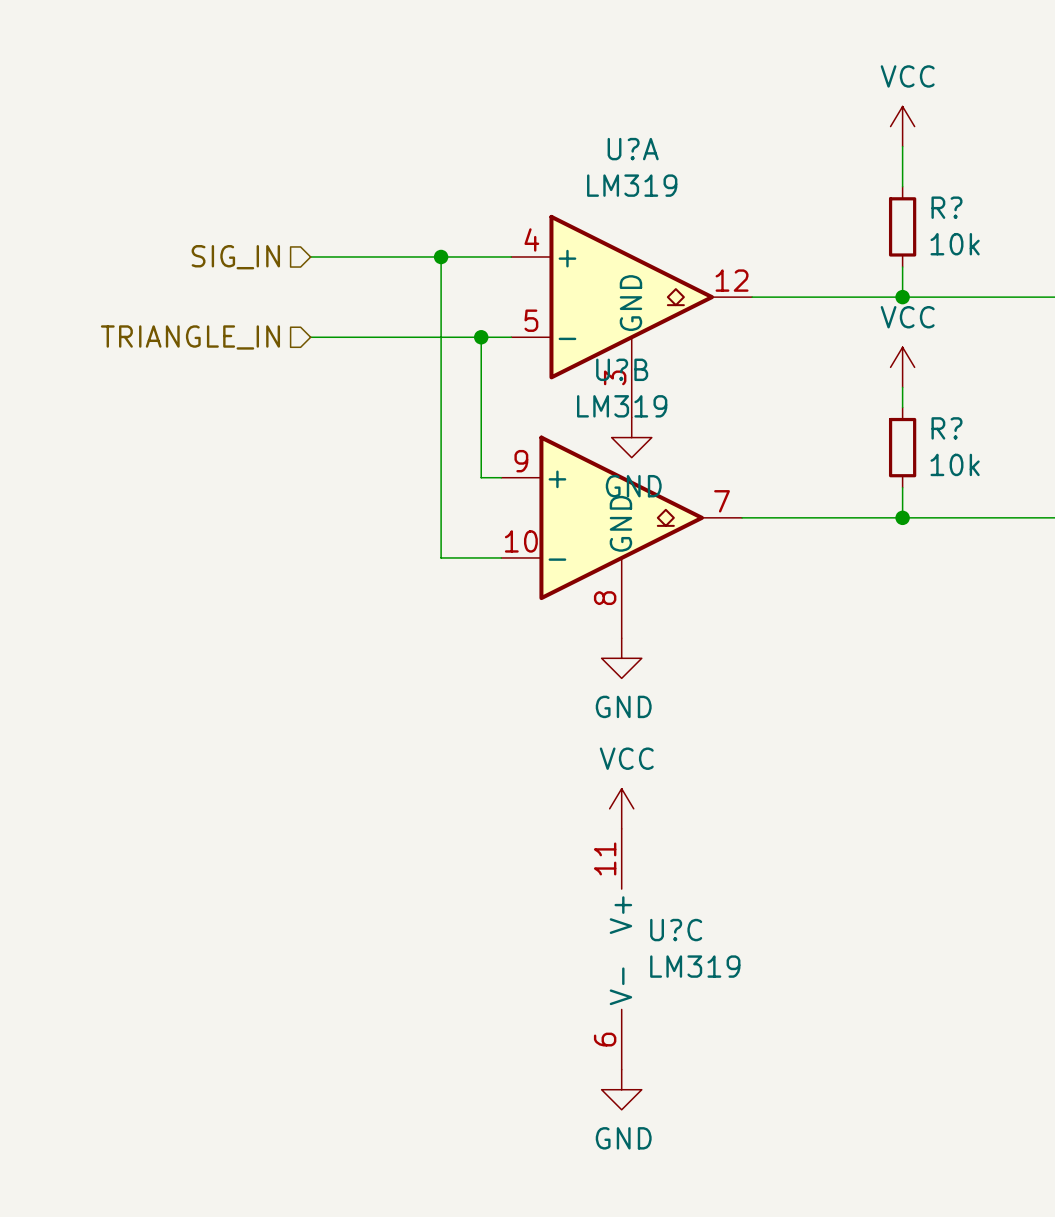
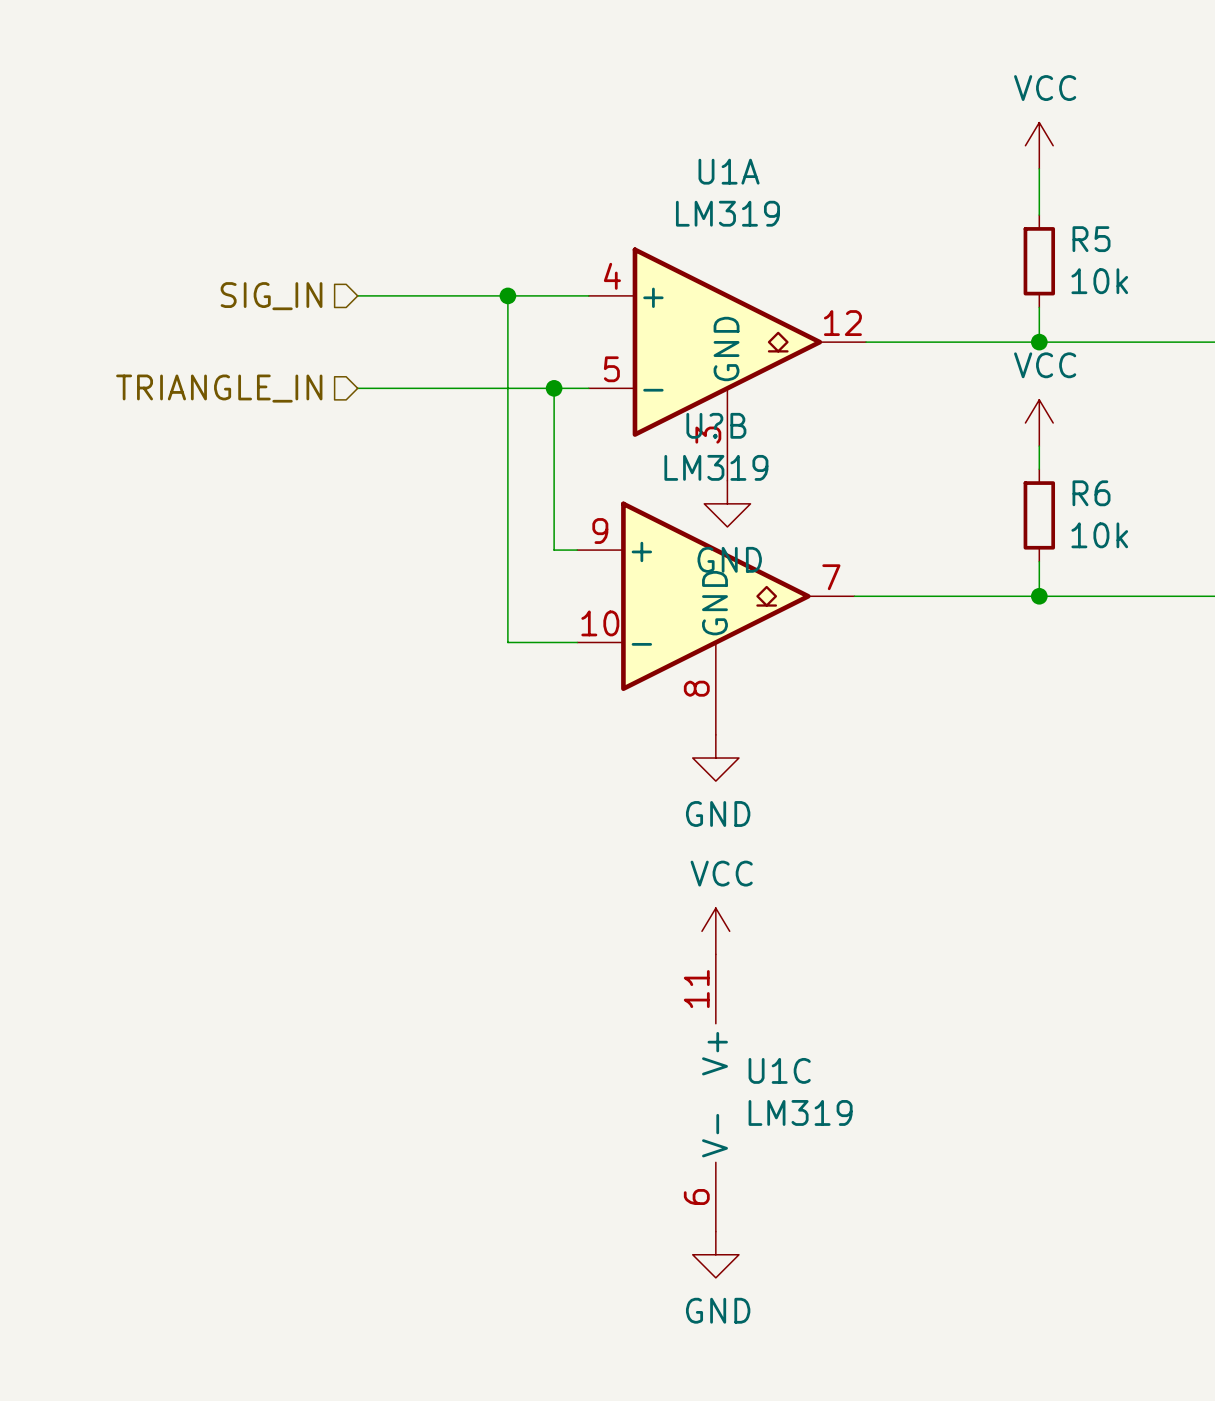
U?A name: U?A (633, 149) -> U1A (729, 171)
R? name: R? (946, 207) -> R5 (1091, 239)
R? name: R? (946, 428) -> R6 (1091, 493)
U?C name: U?C (676, 930) -> U1C (779, 1070)

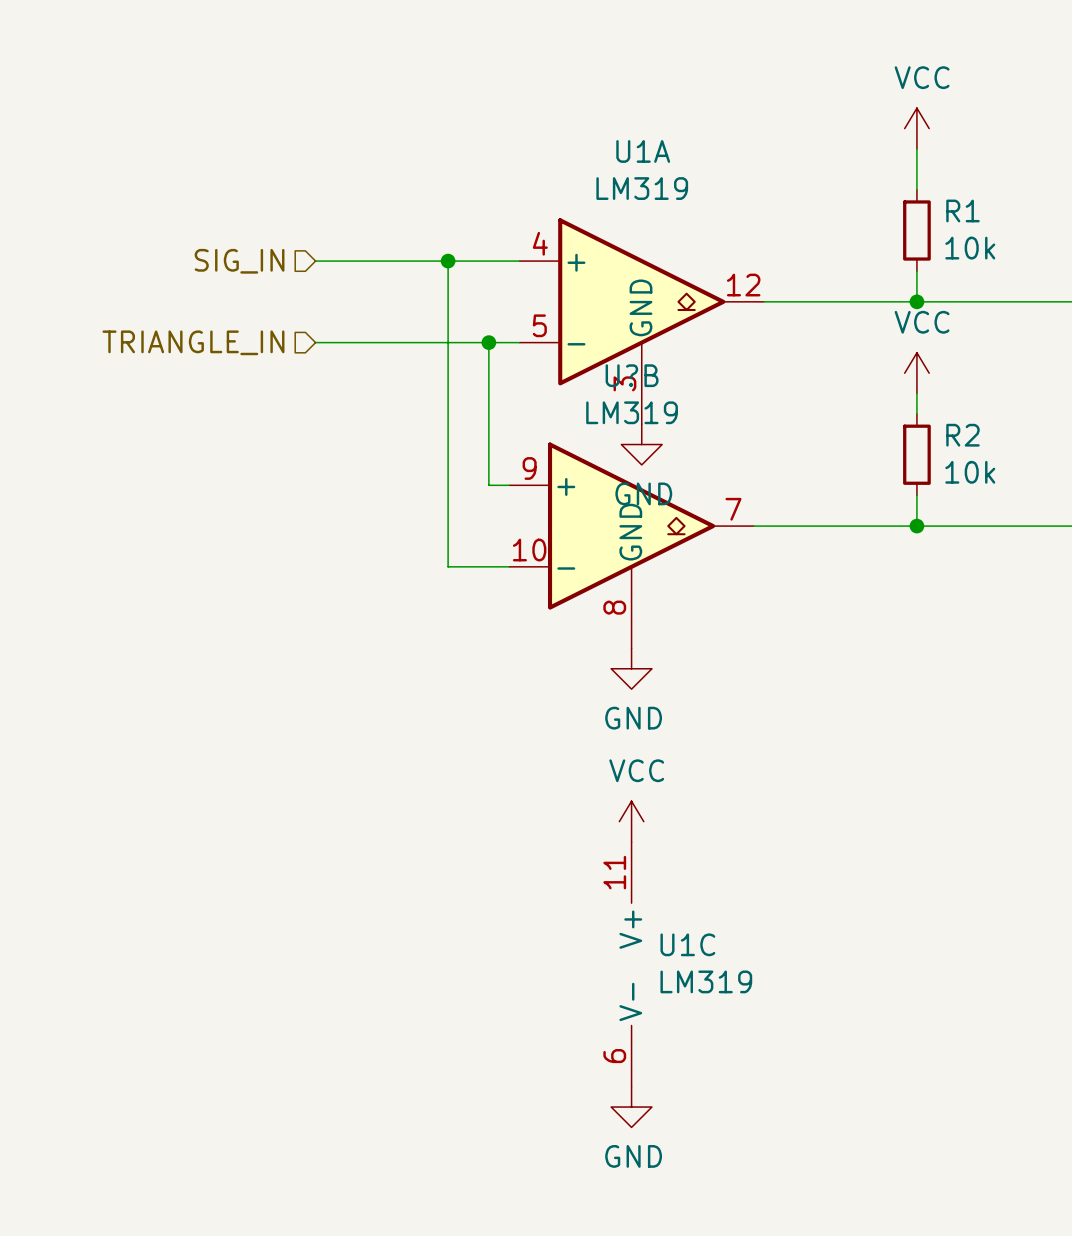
R5 name: R5 (1091, 239) -> R1 (962, 210)
R6 name: R6 (1091, 493) -> R2 (962, 435)

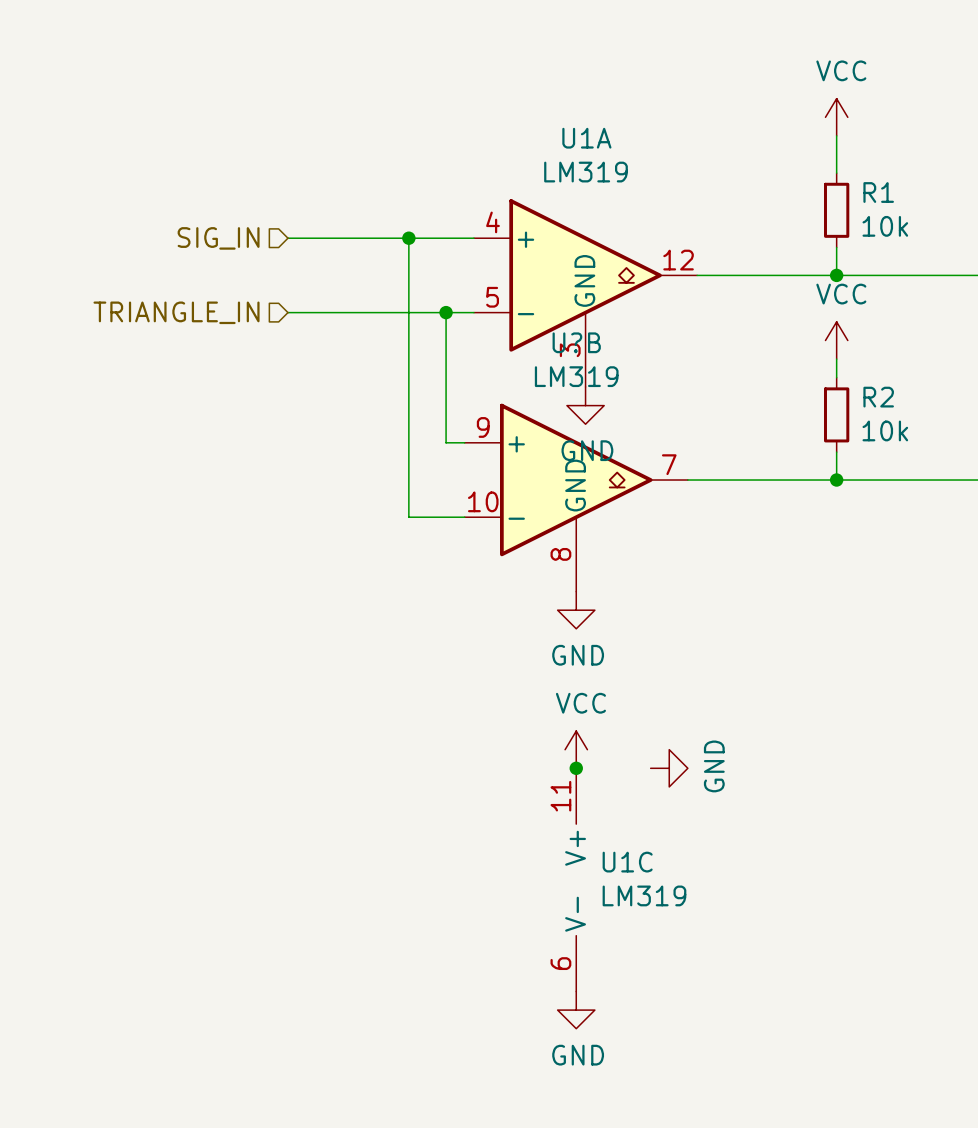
junction: none -> (576, 768)
power symbol: none -> GND (669, 768)

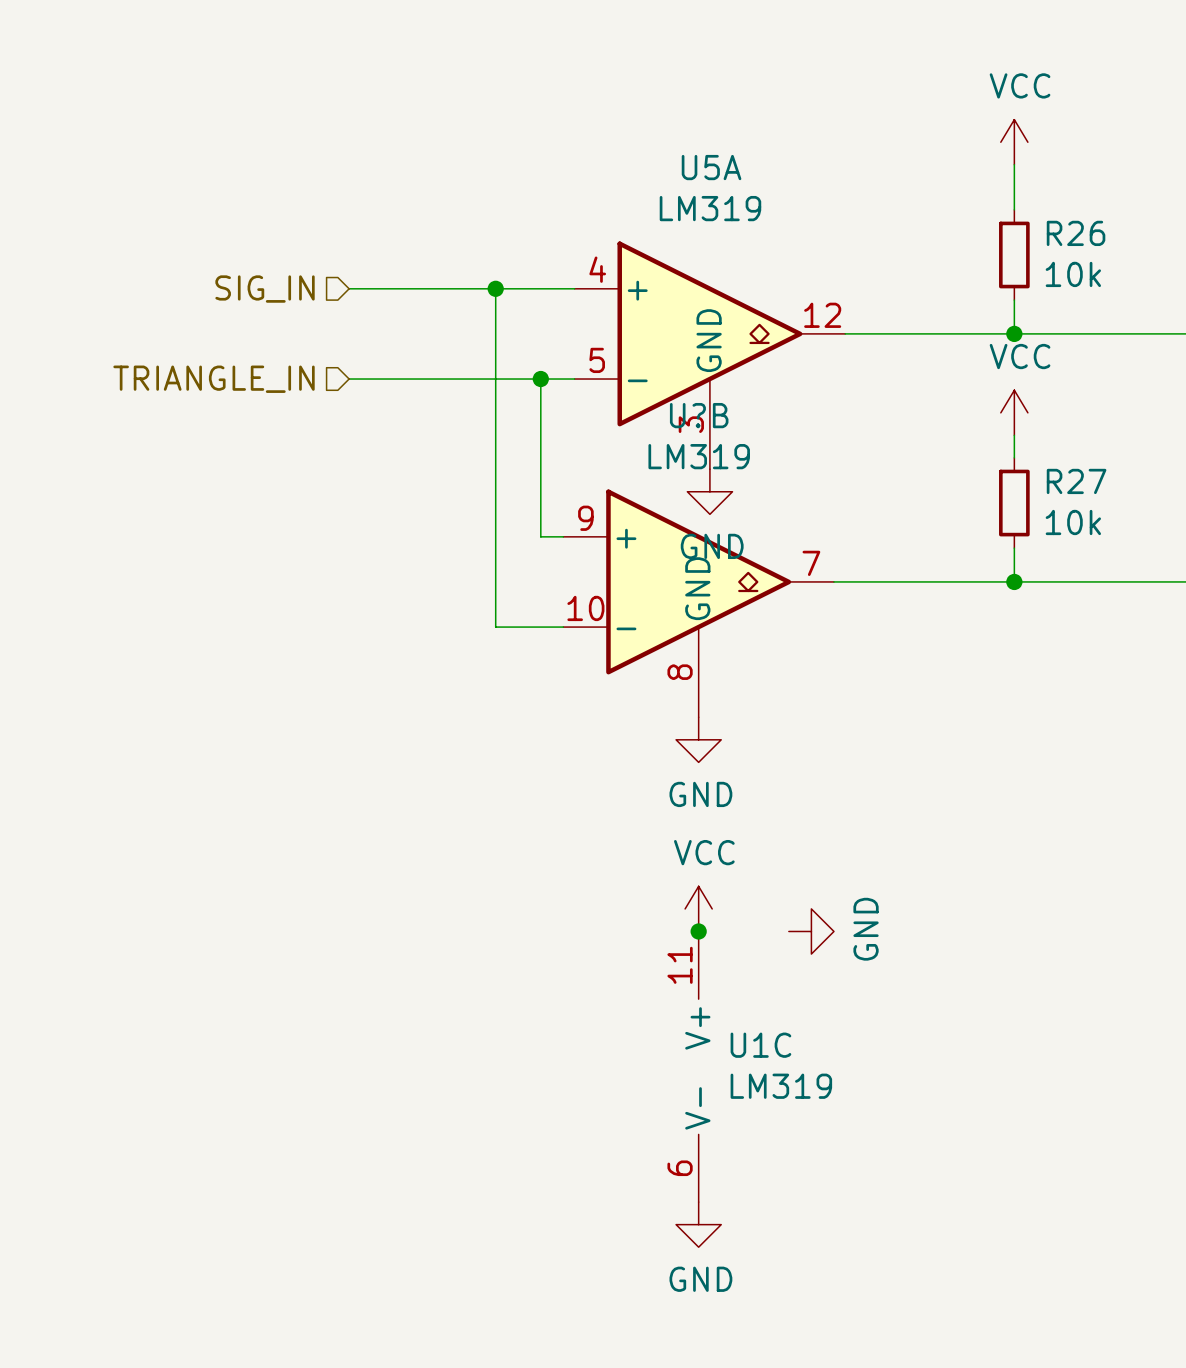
U1A name: U1A (586, 138) -> U5A (711, 167)
R1 name: R1 (878, 192) -> R26 (1076, 233)
R2 name: R2 (878, 397) -> R27 (1076, 481)

